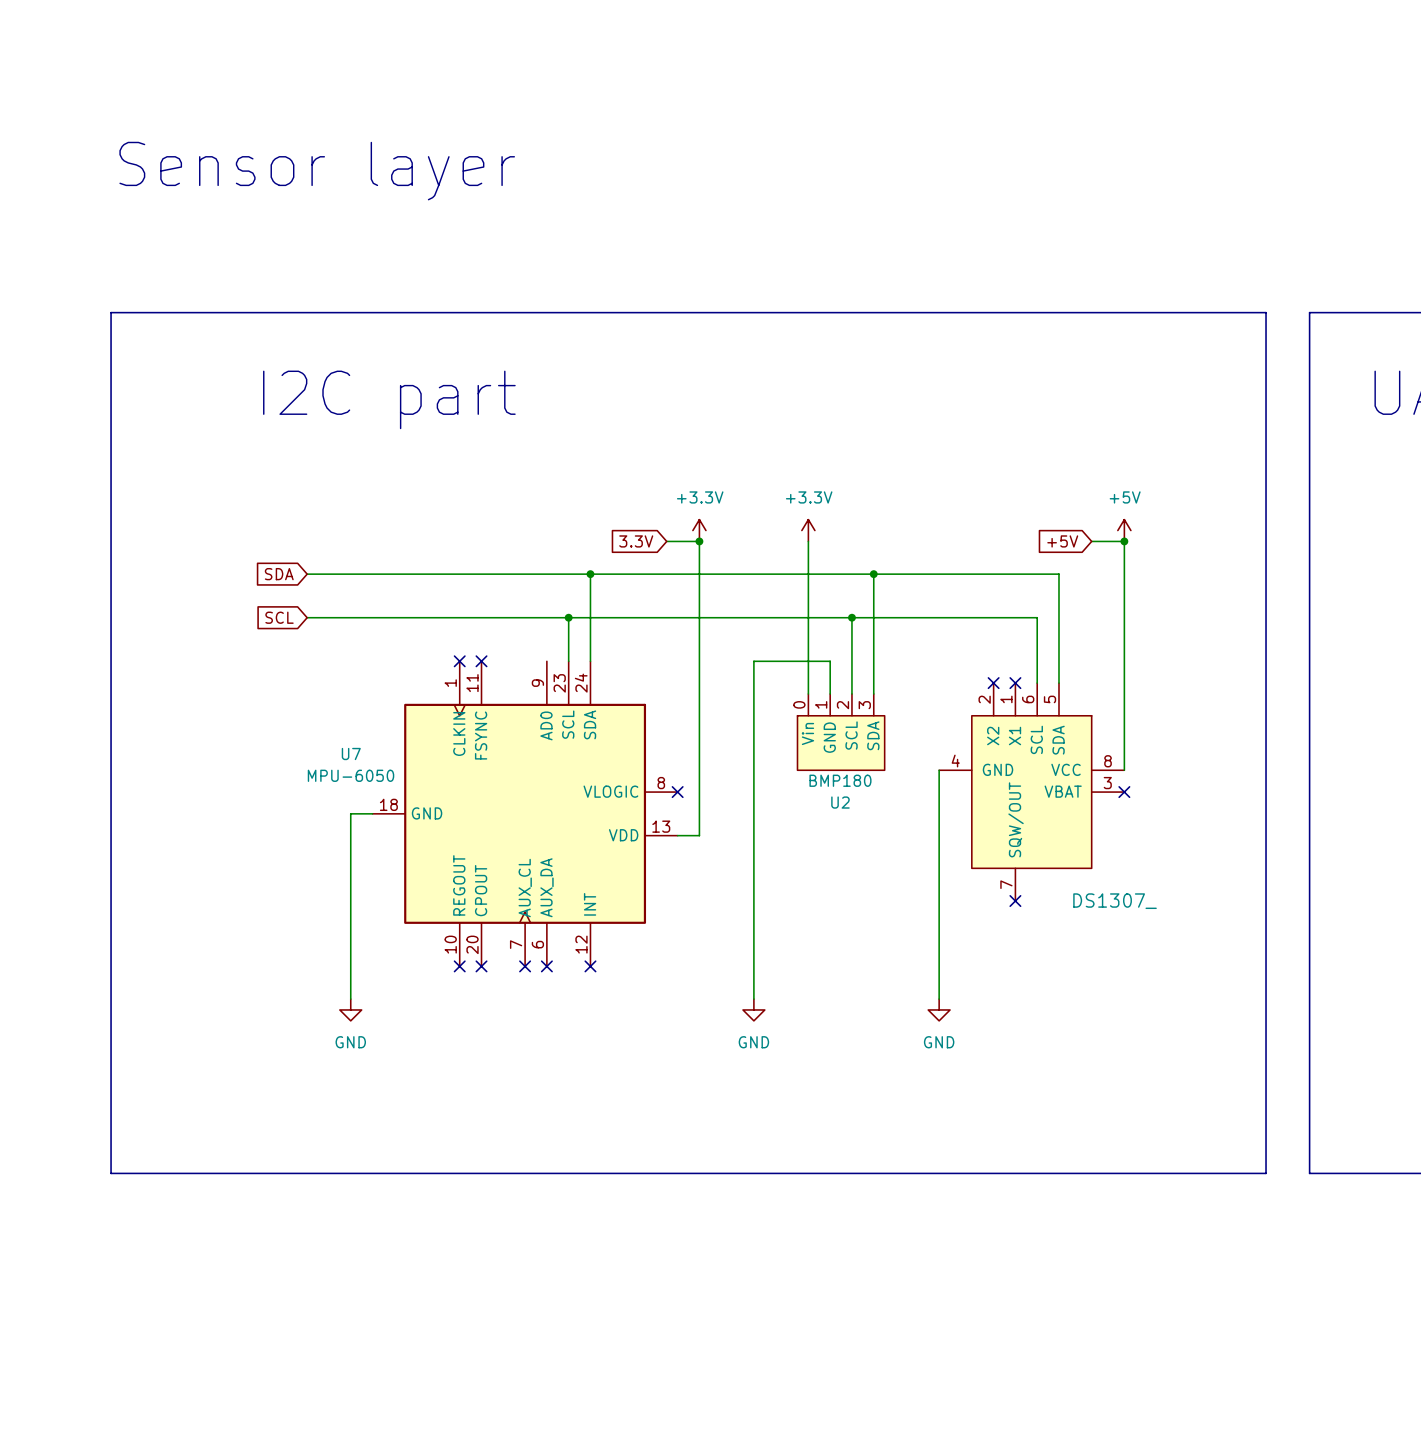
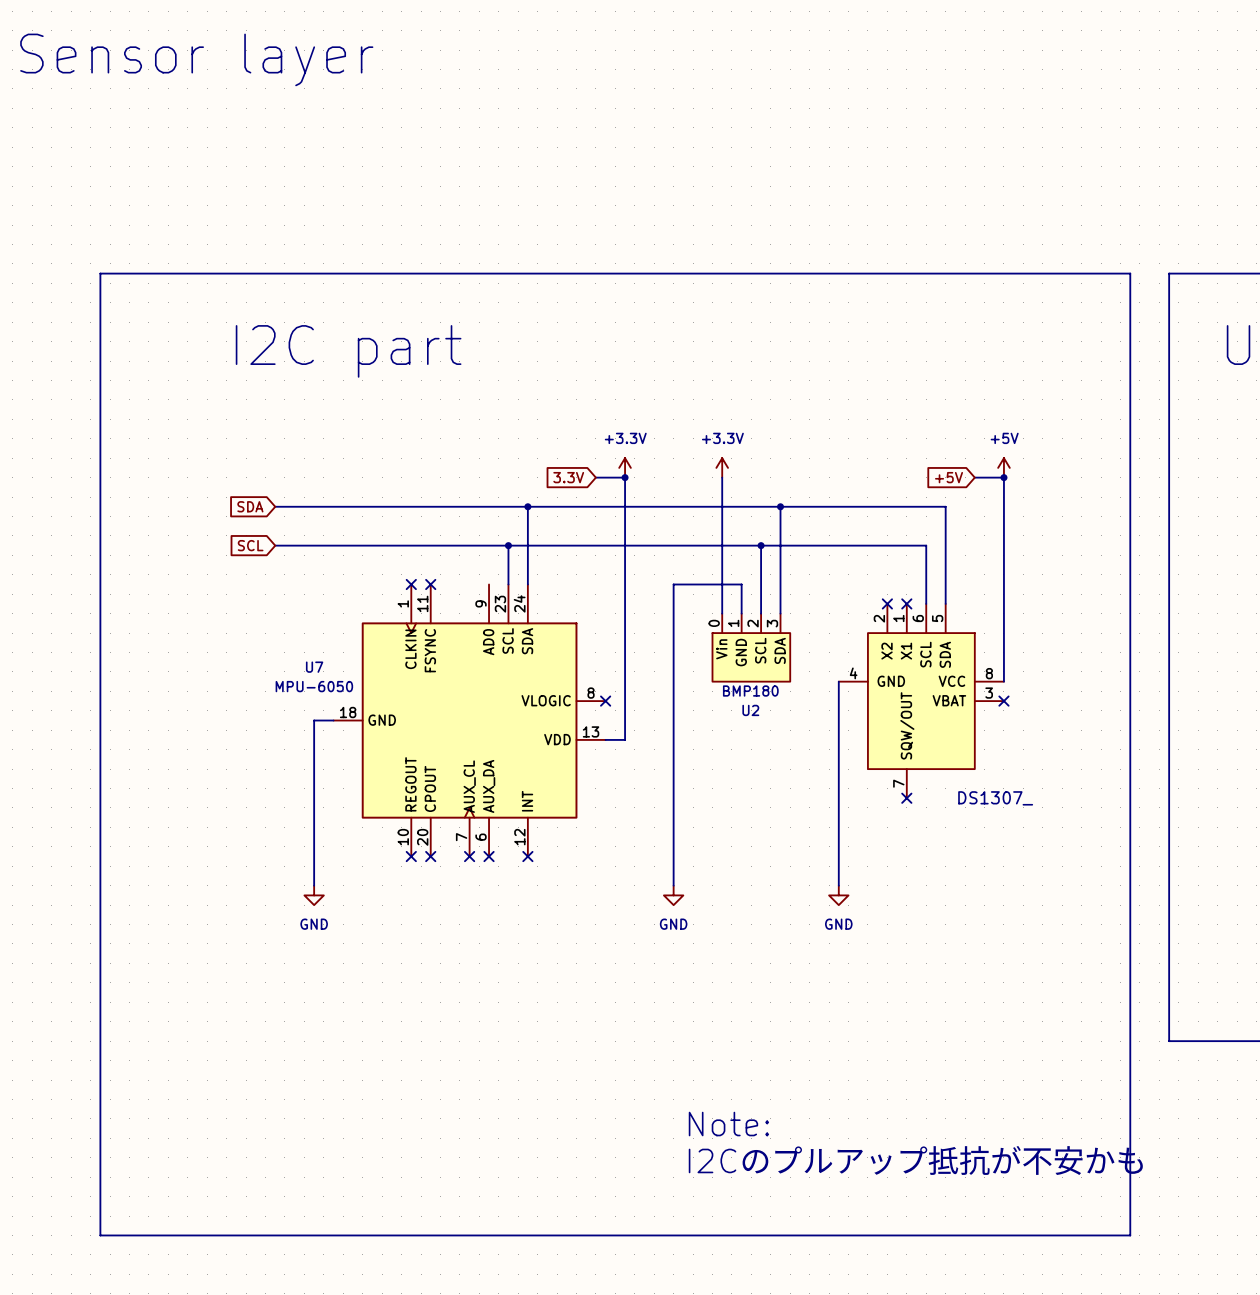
text position: Sensor layer (317, 171) -> Sensor layer (196, 59)
line: (111, 1173) (1266, 1173) -> (100, 1041) (100, 1235) (1130, 1235) (1130, 1041)
text: none -> Note: (728, 1124)
text: none -> I2Cのプルアップ抵抗が不安かも (916, 1160)

